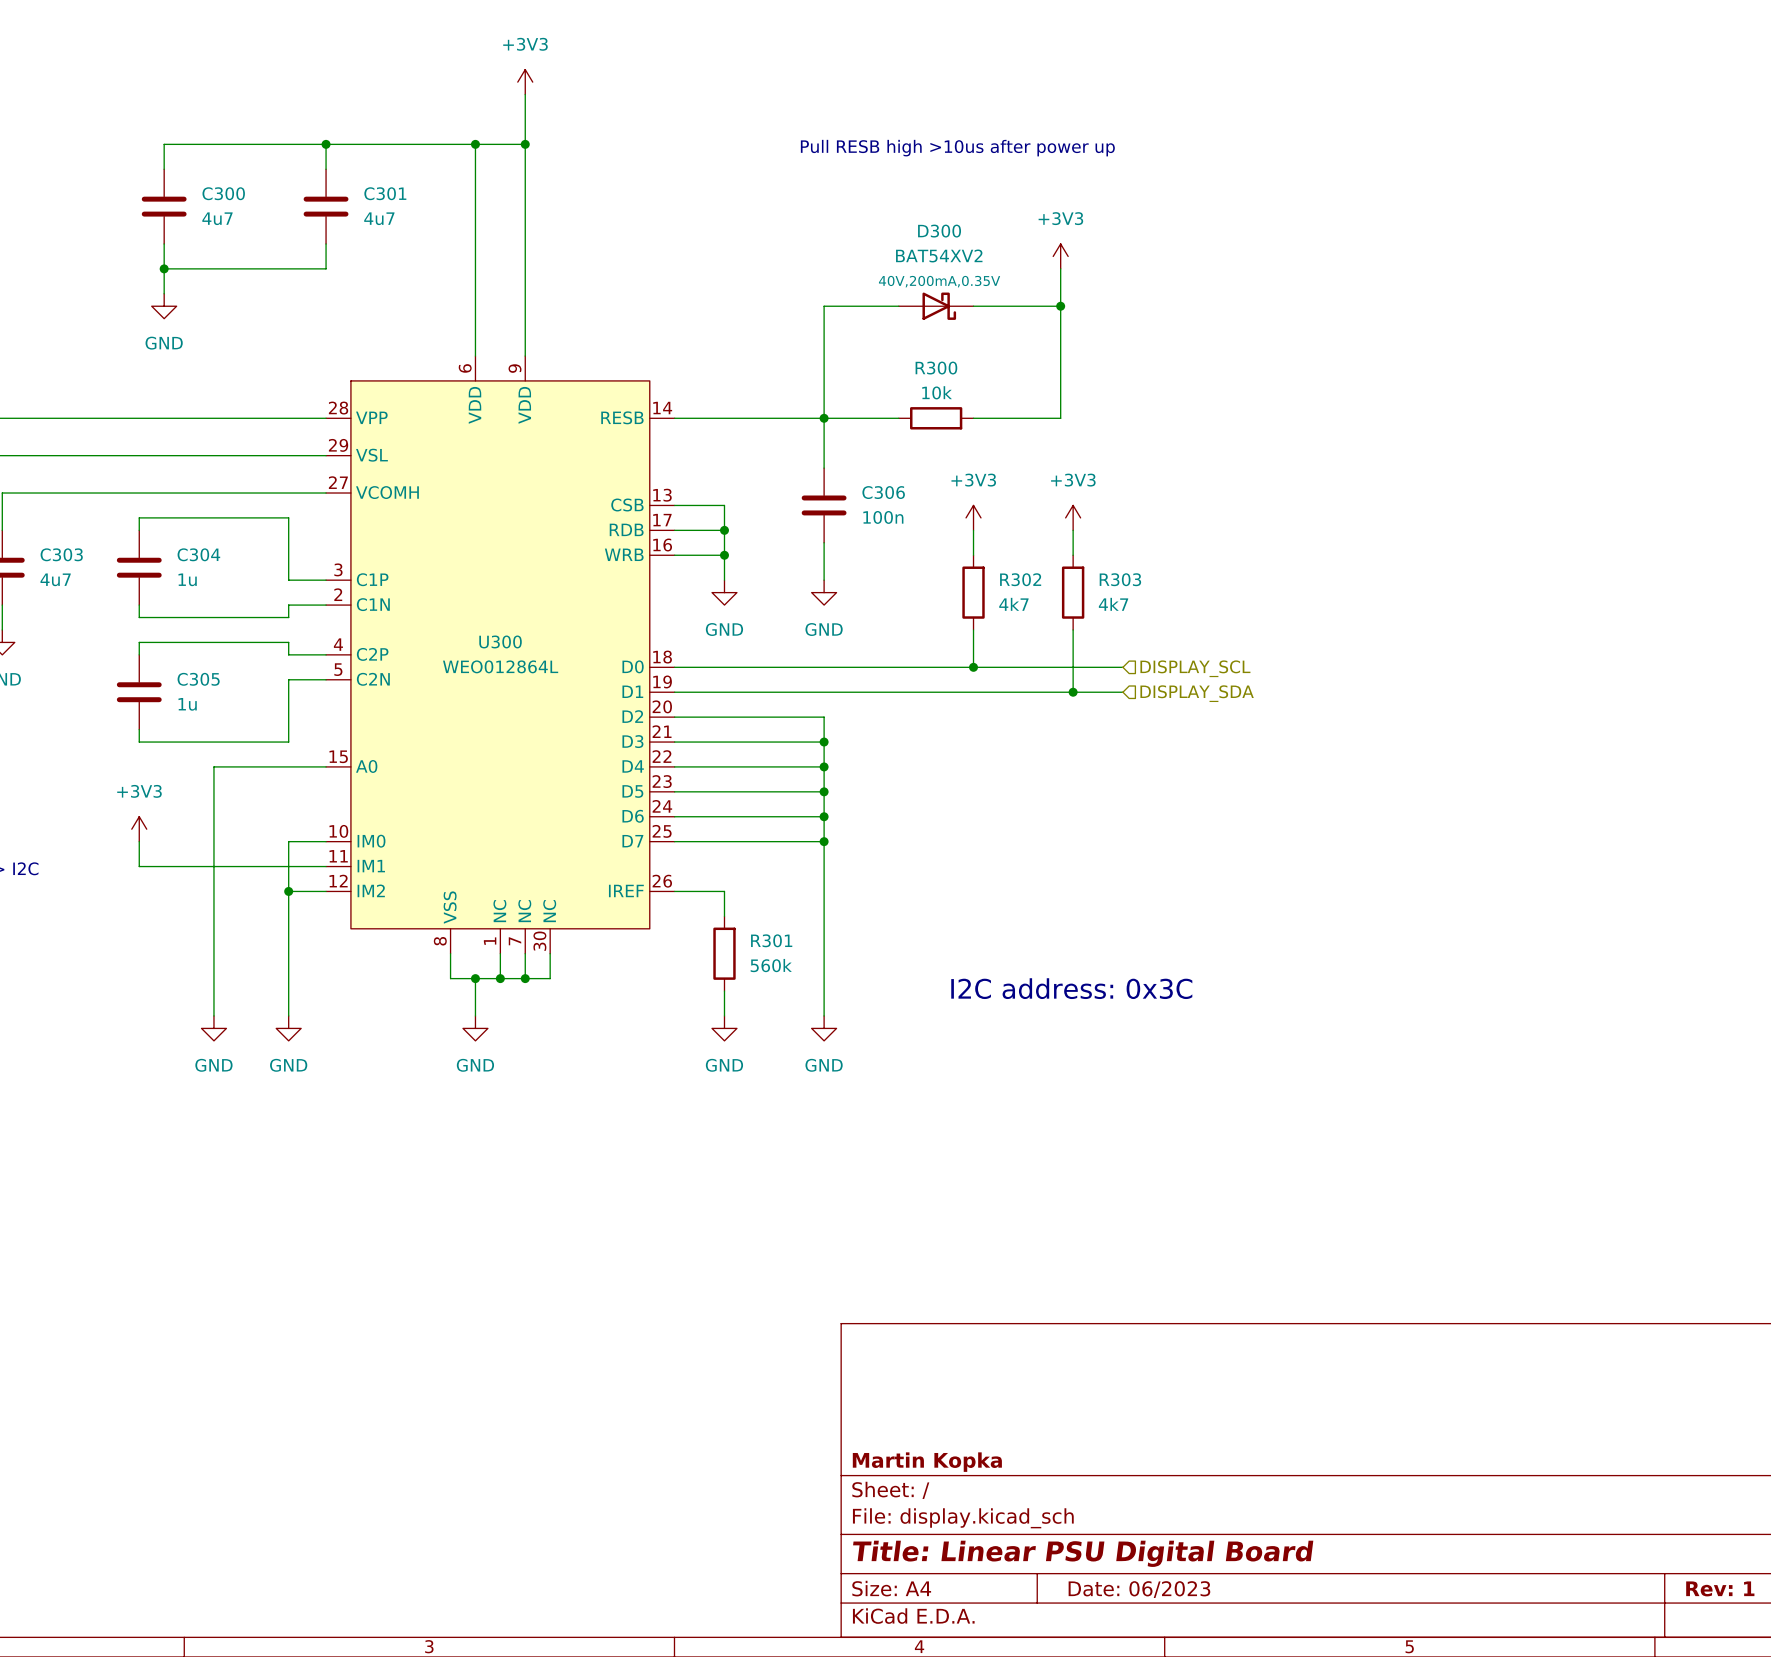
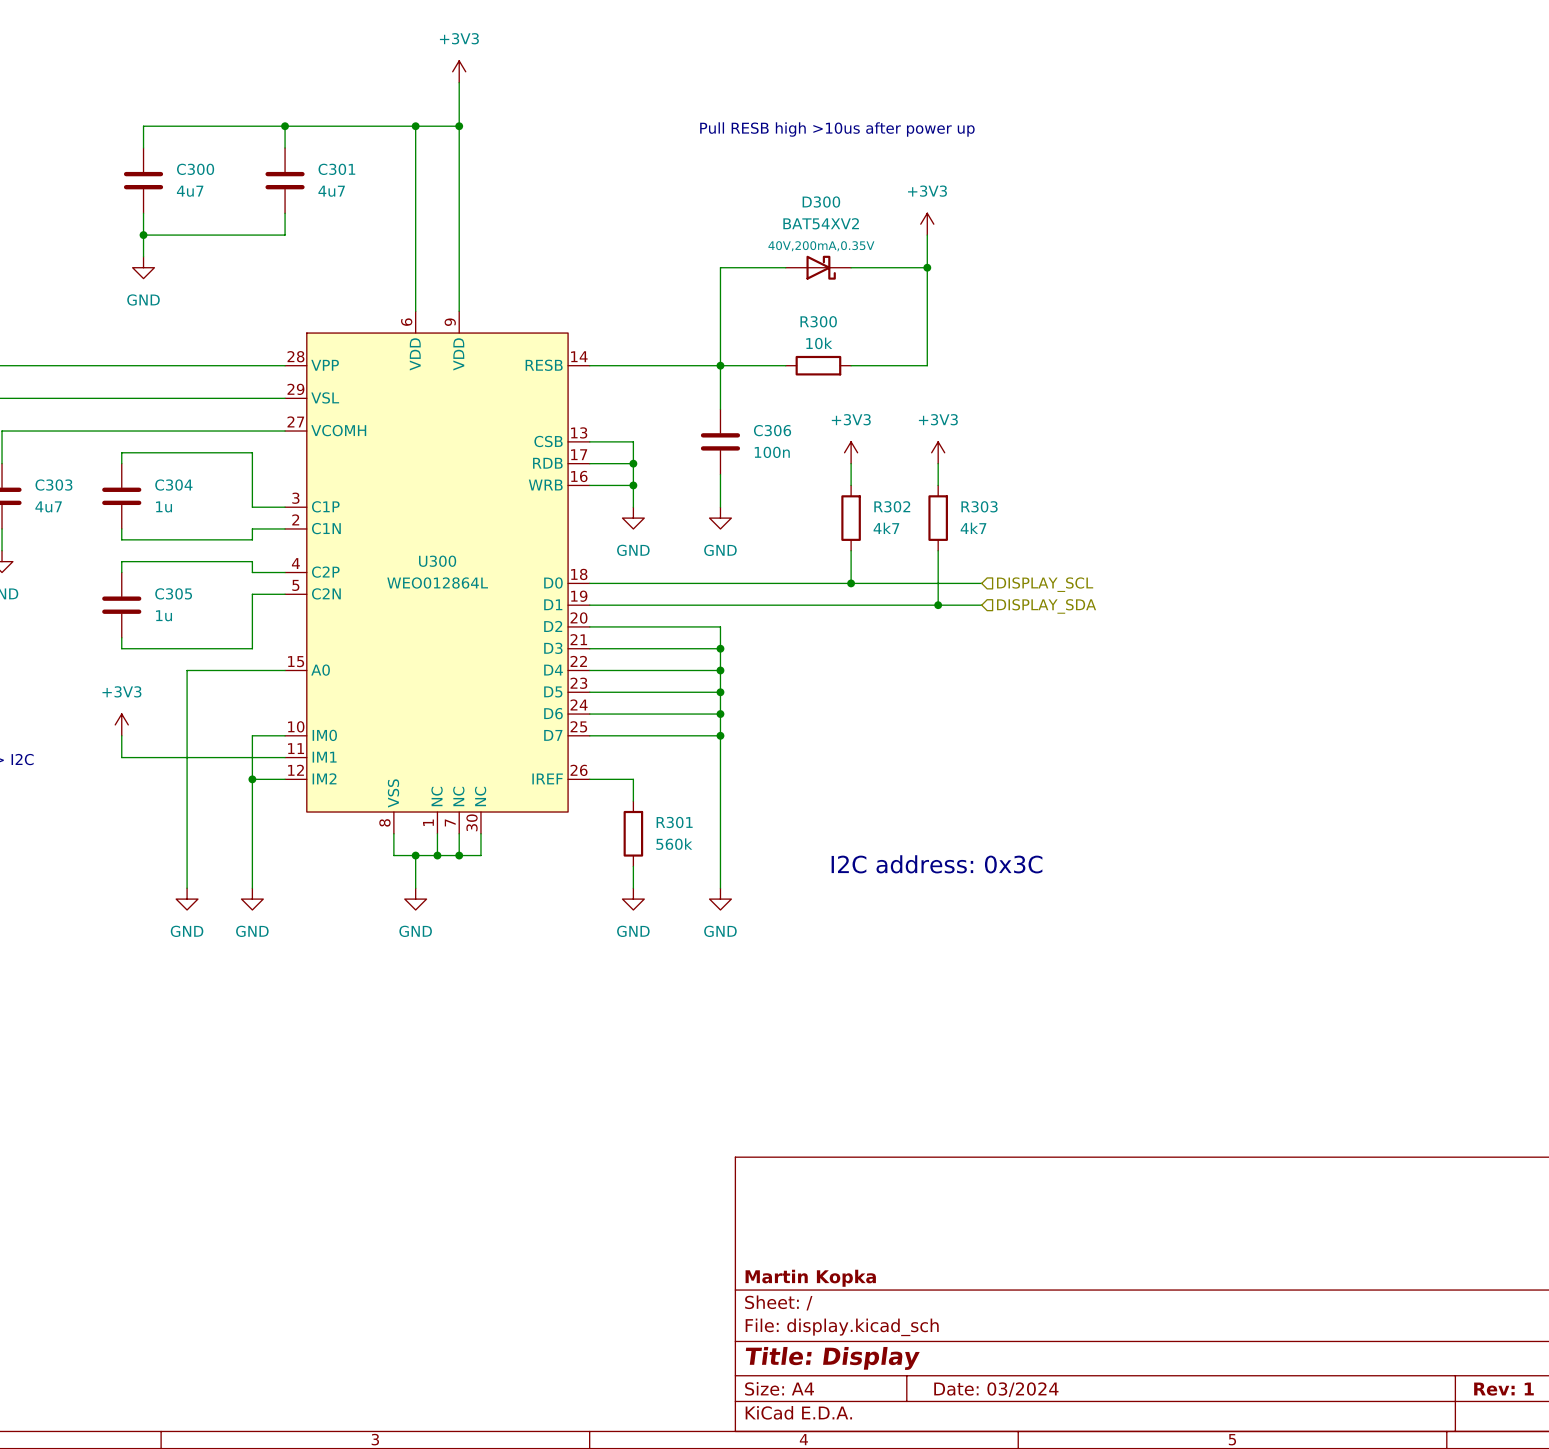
title block: Title: Linear PSU Digital Board (1083, 1553) -> Title: Display (832, 1358)
title block: Date: 06/2023 (1139, 1589) -> Date: 03/2024 (996, 1389)

